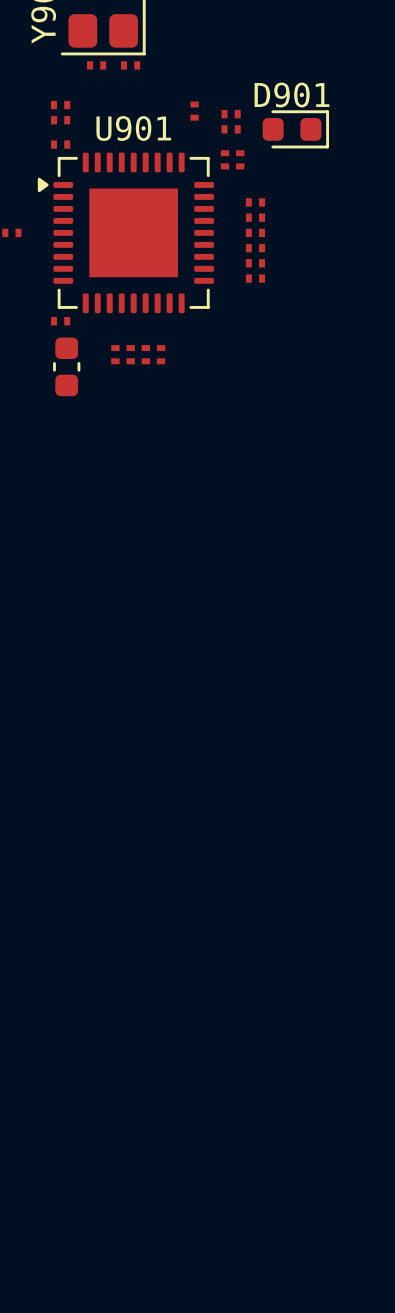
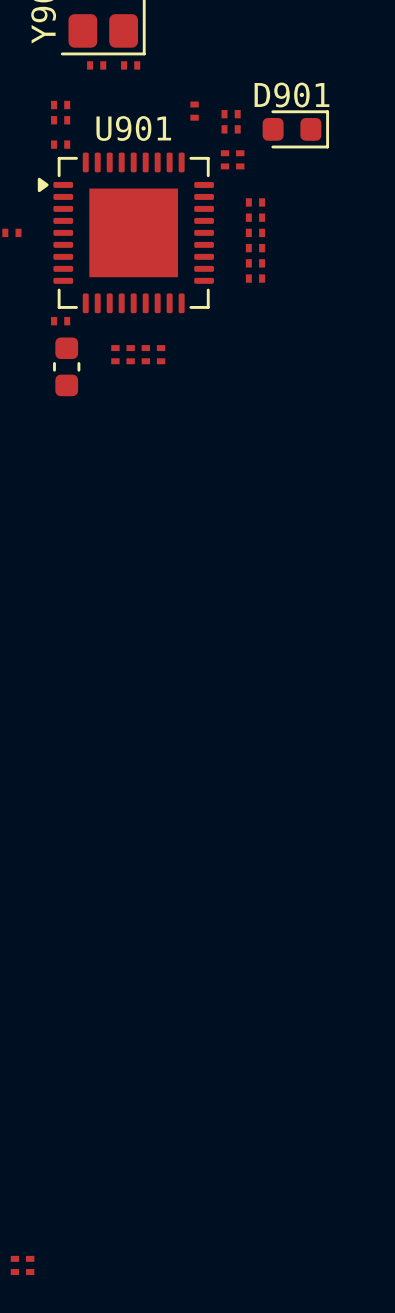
part: none -> (14, 1265)
part: none -> (30, 1265)

